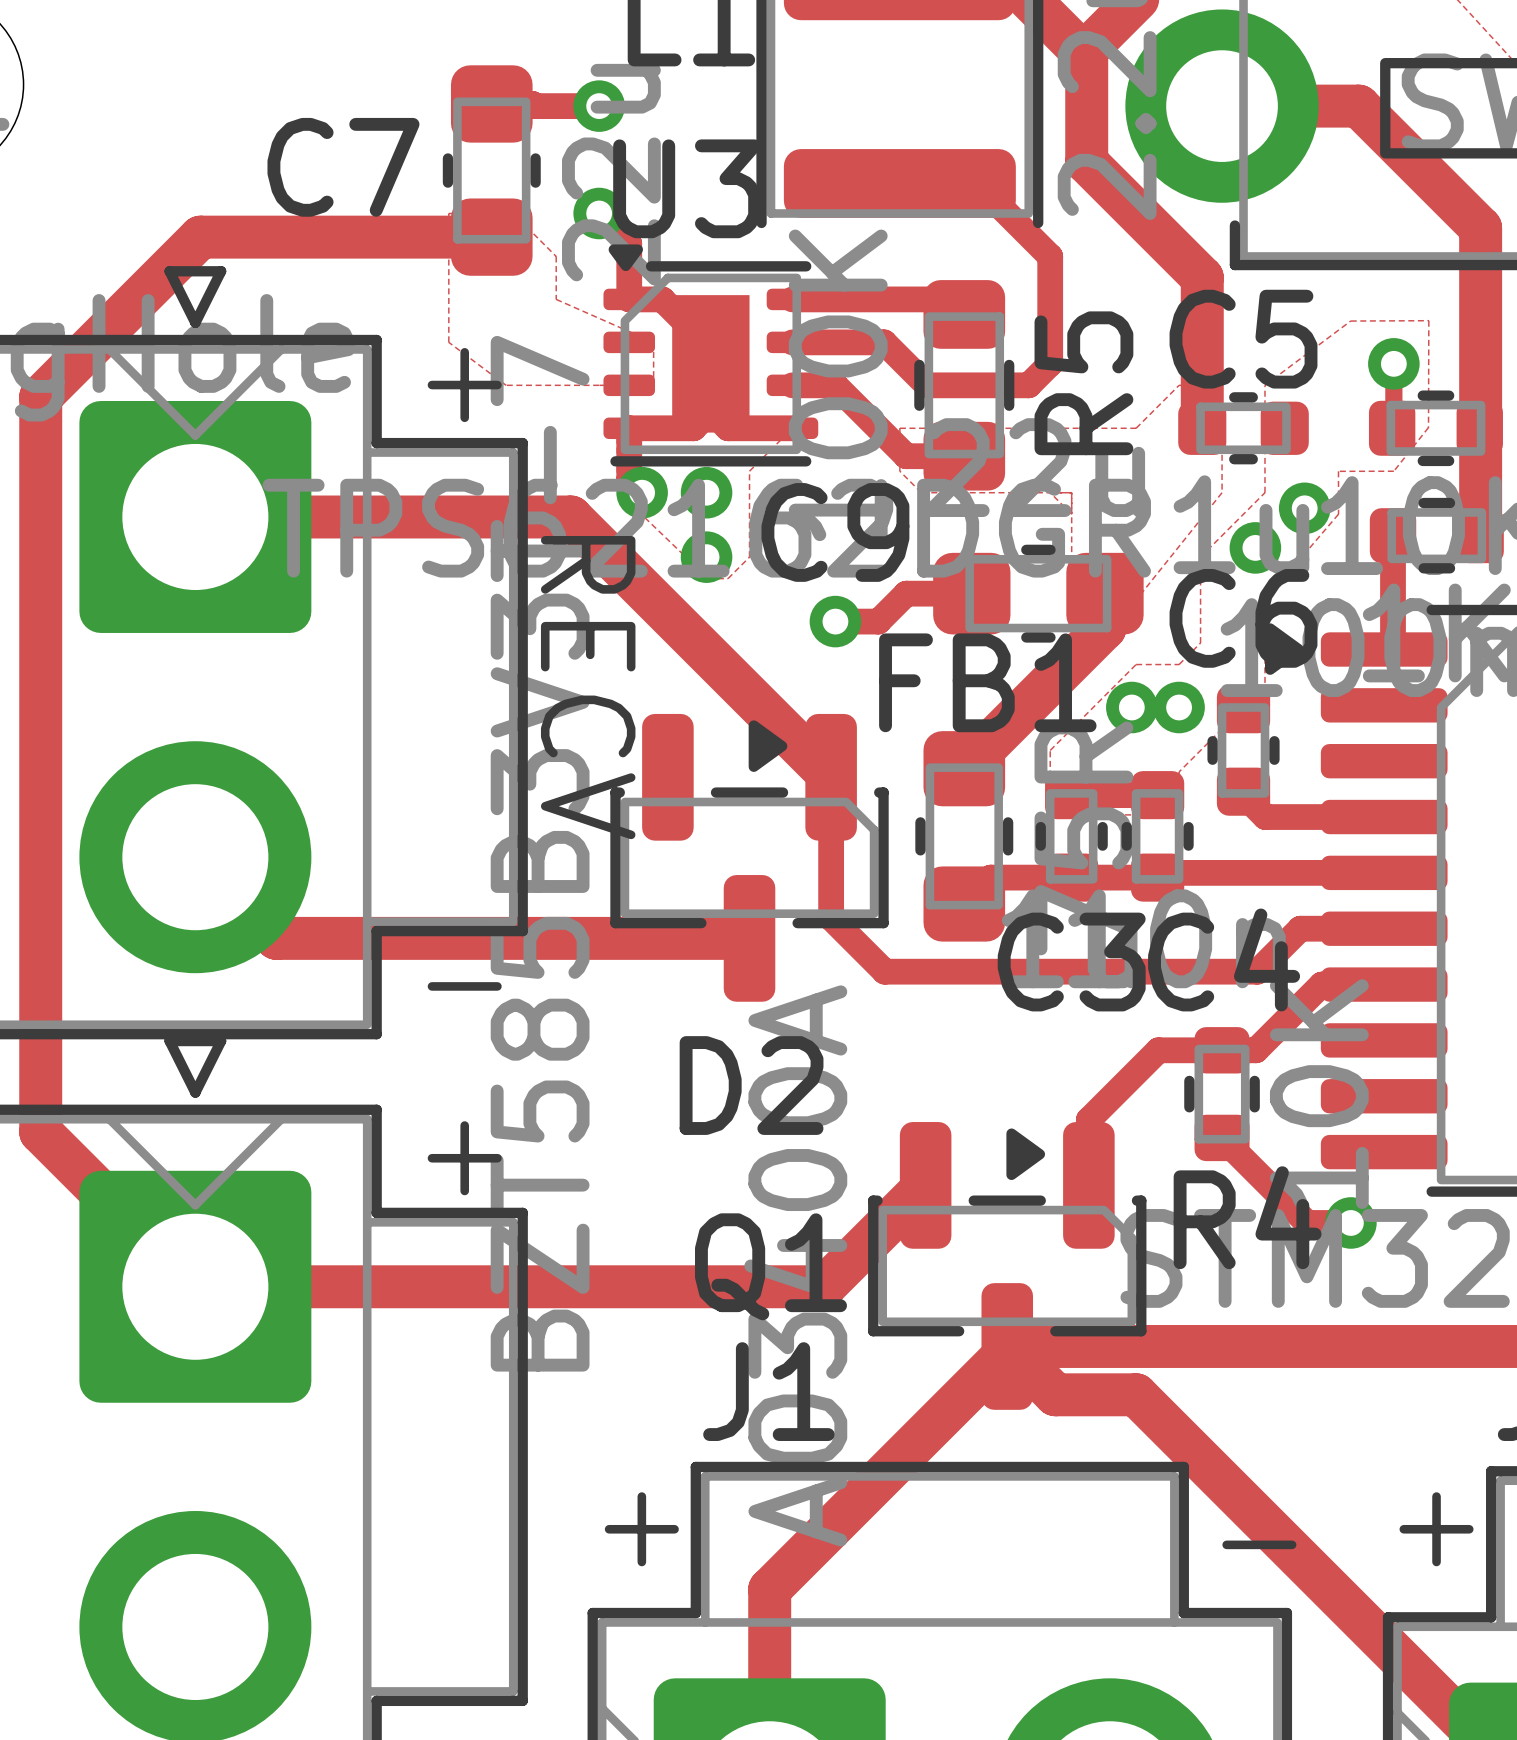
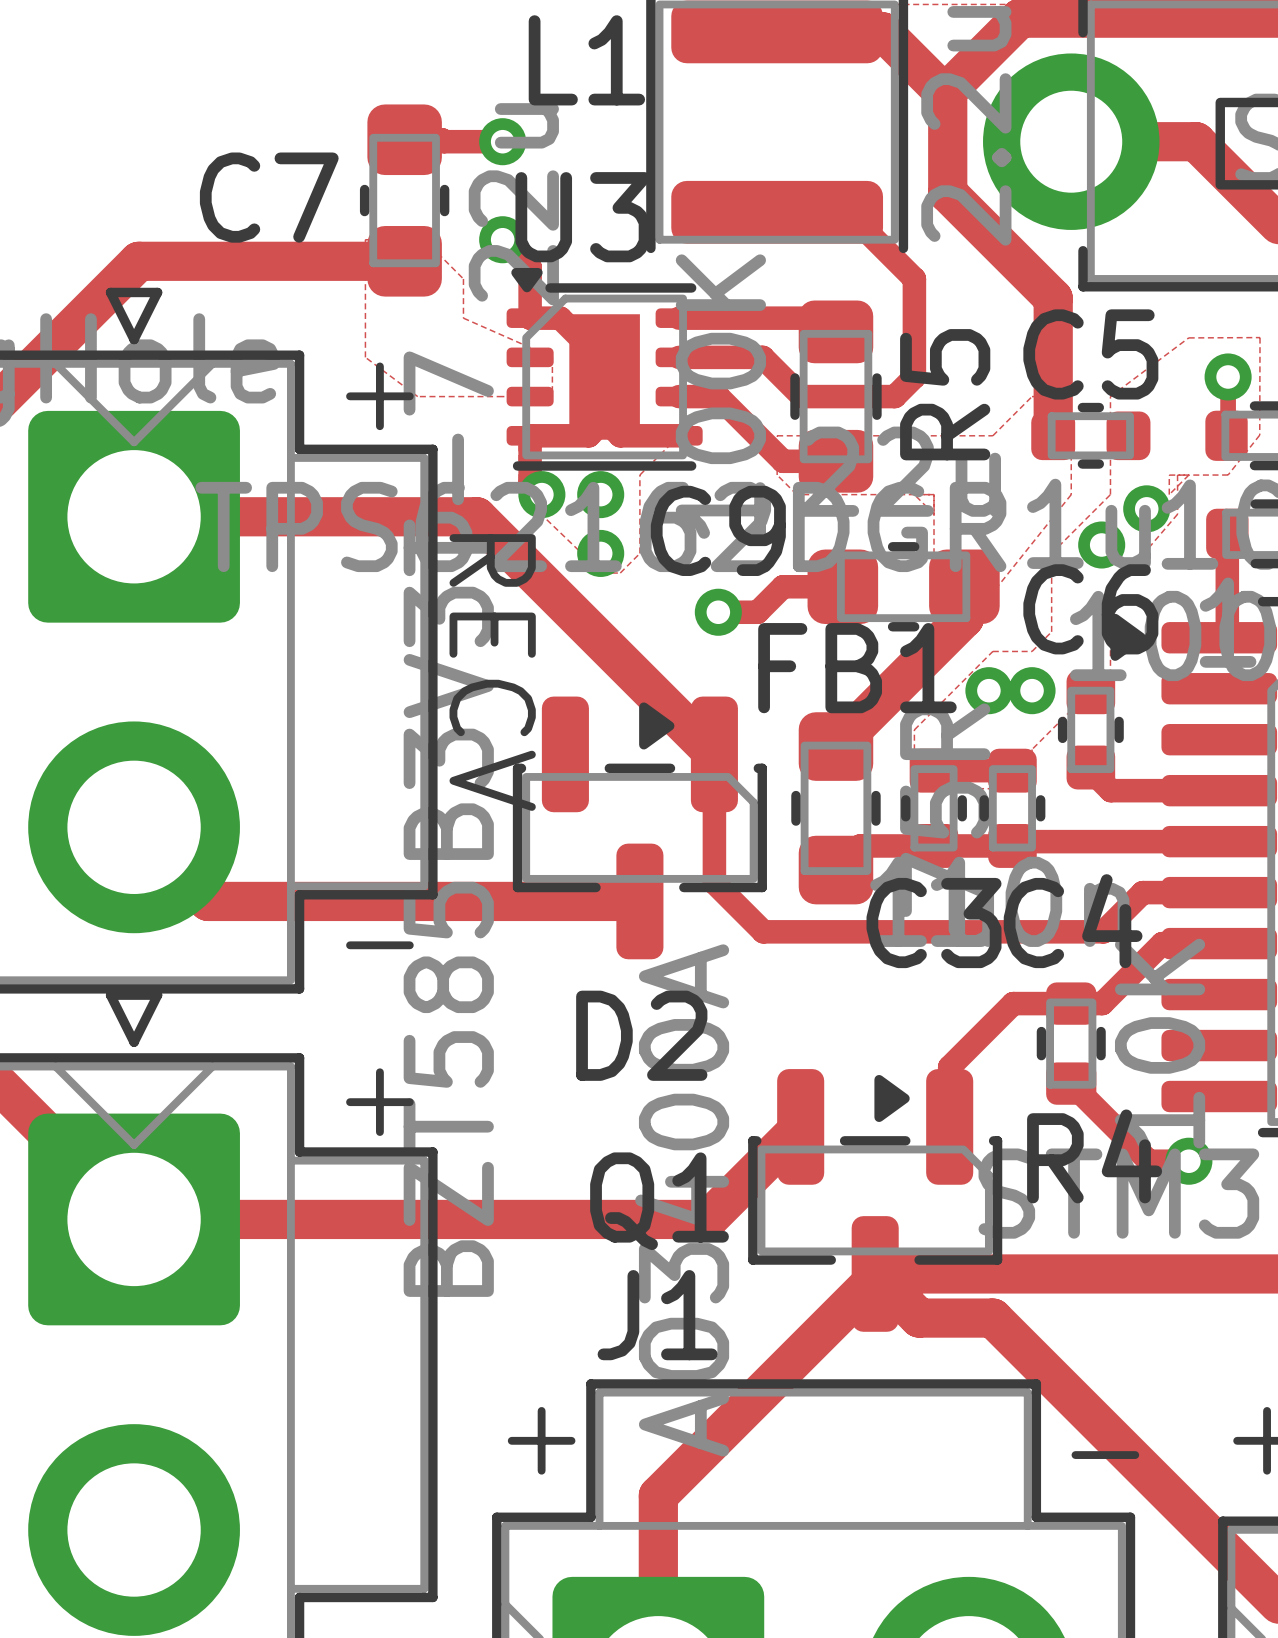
top zone outline: none -> (1169, 475) (1169, 494) (1188, 475) (1169, 475)

